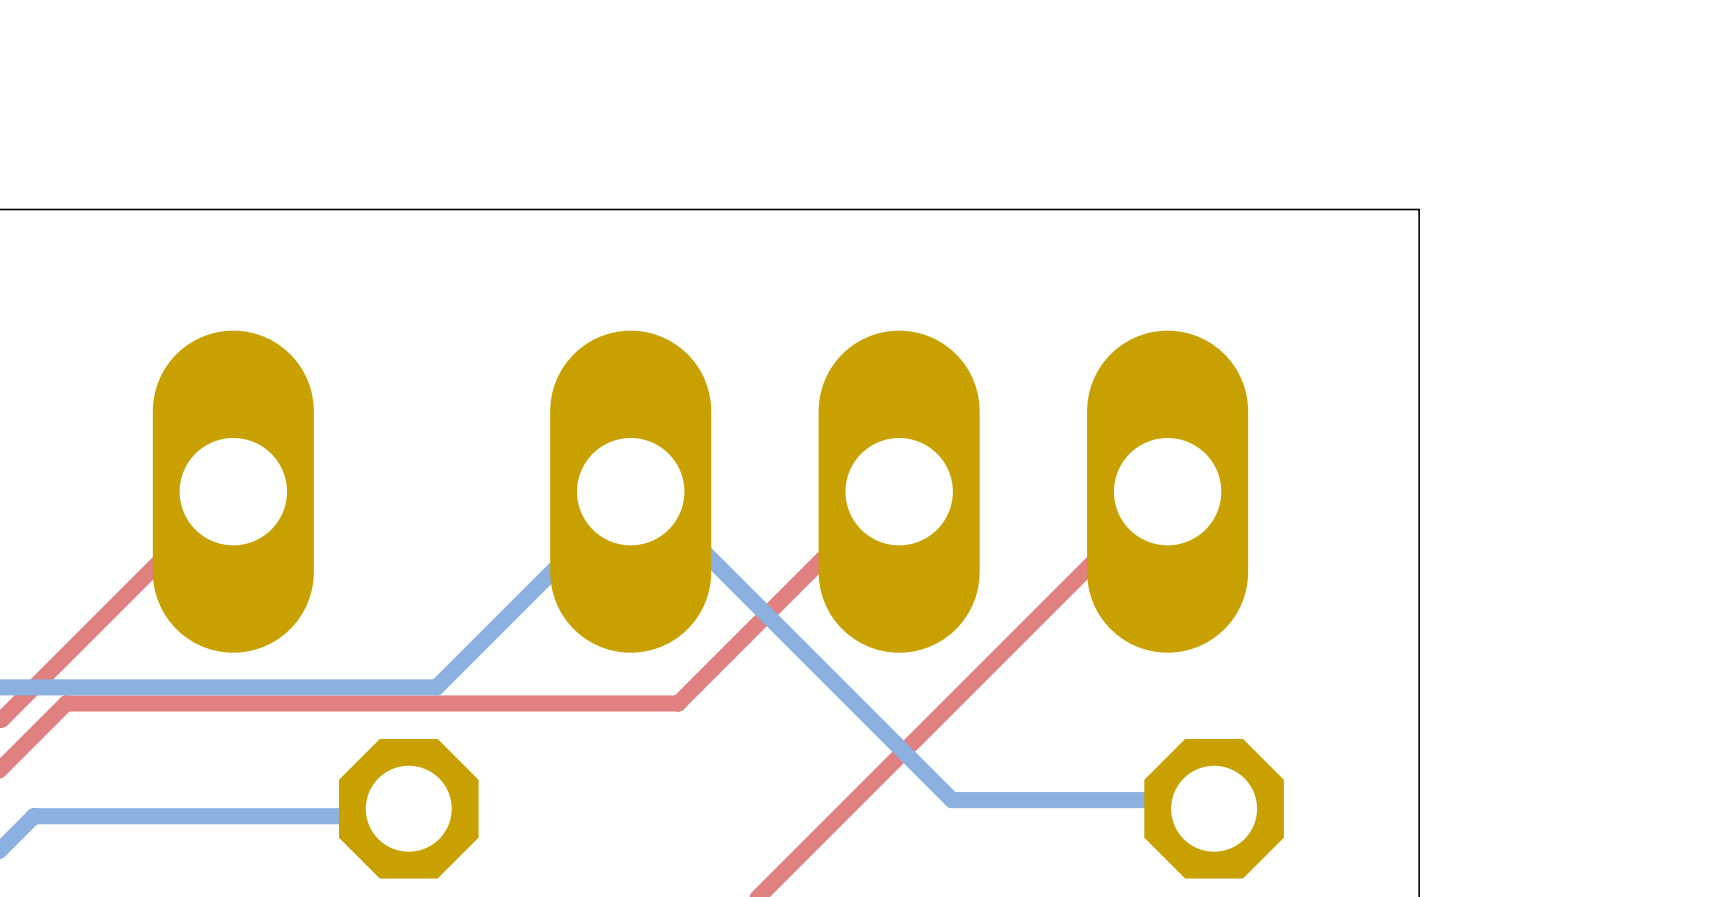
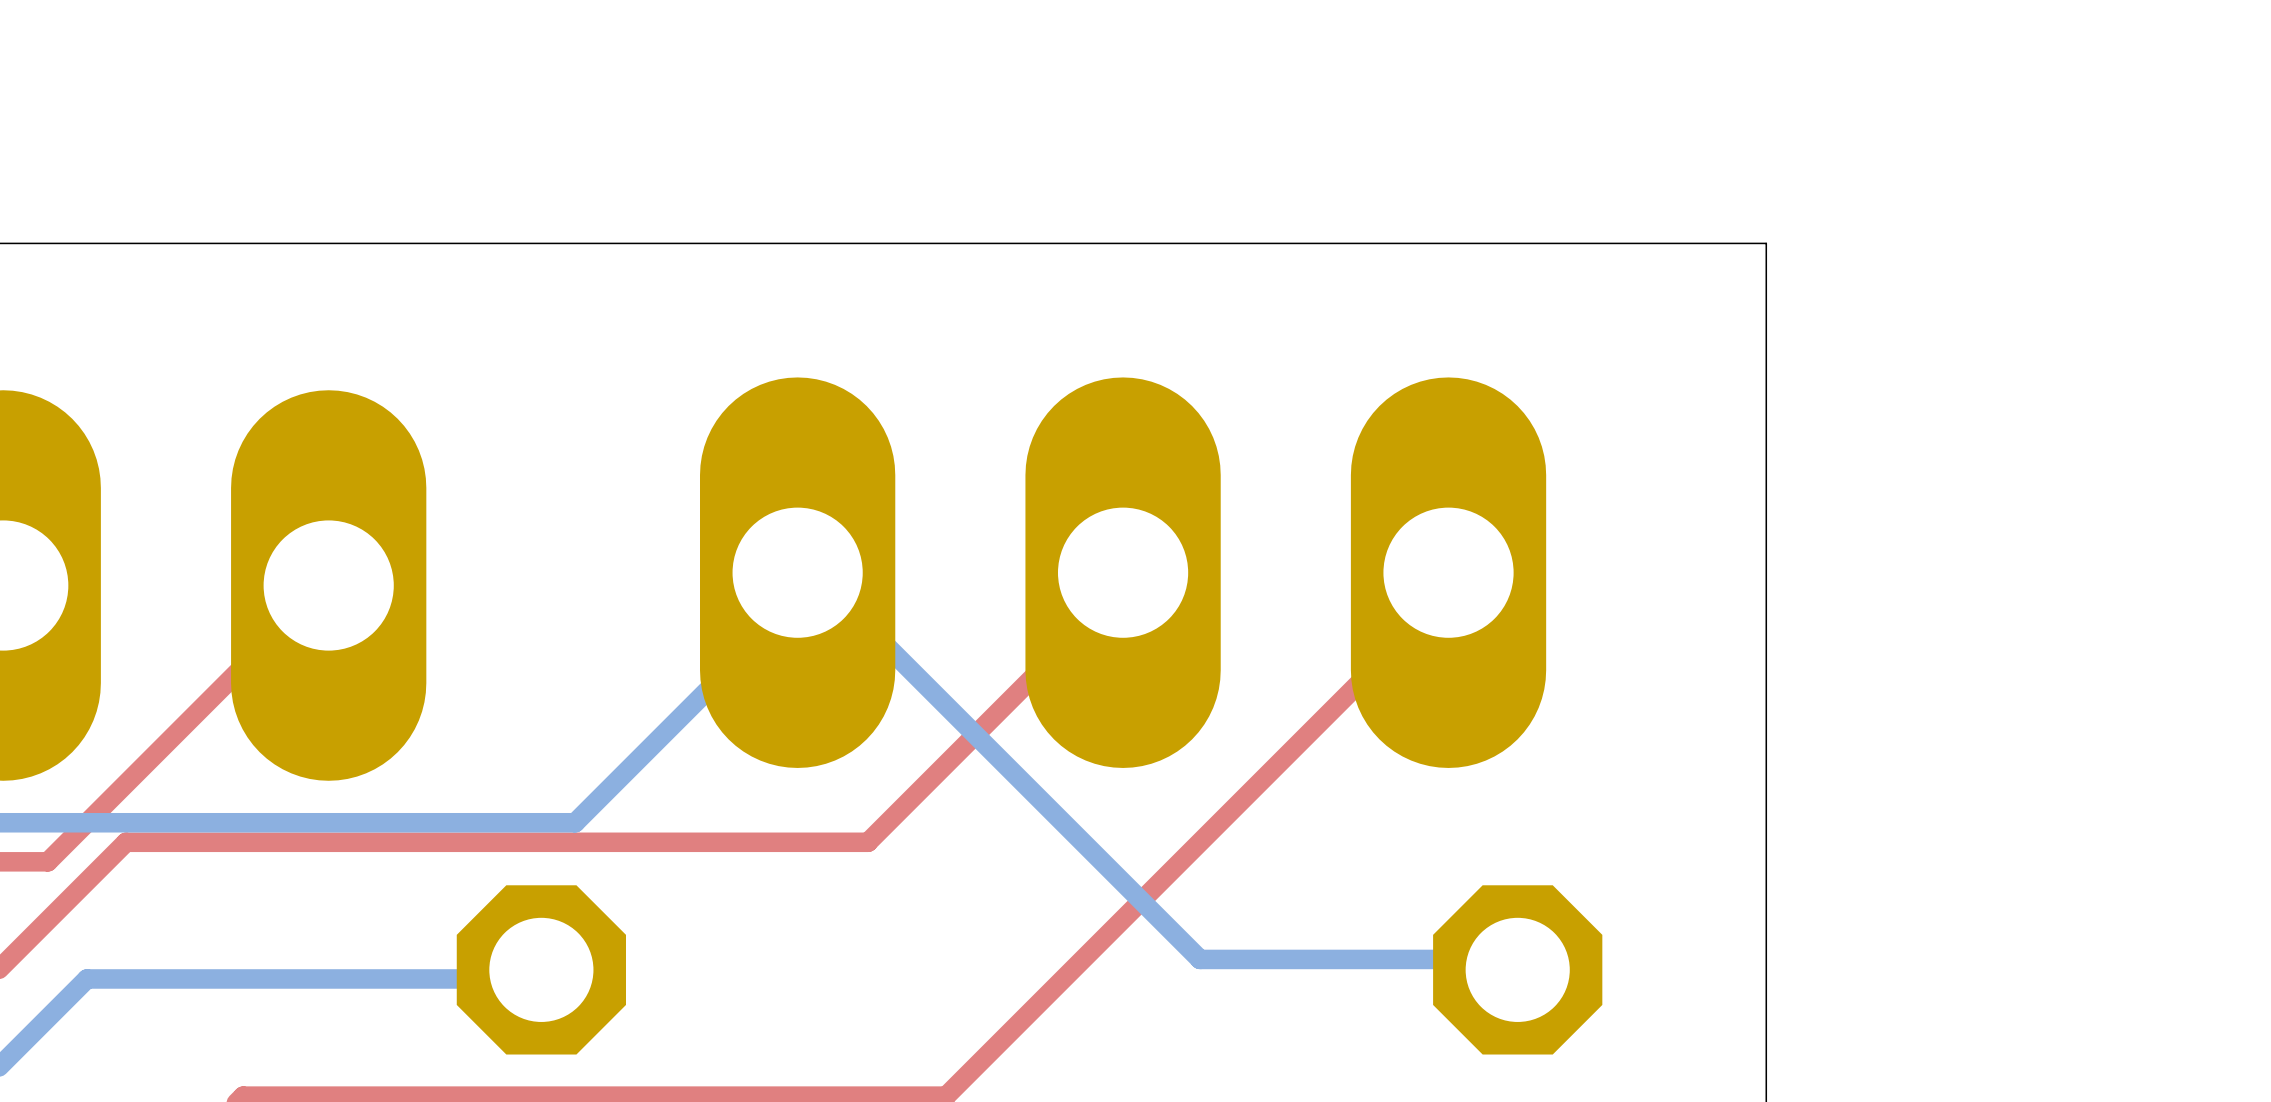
part position: (899, 491) -> (1123, 572)

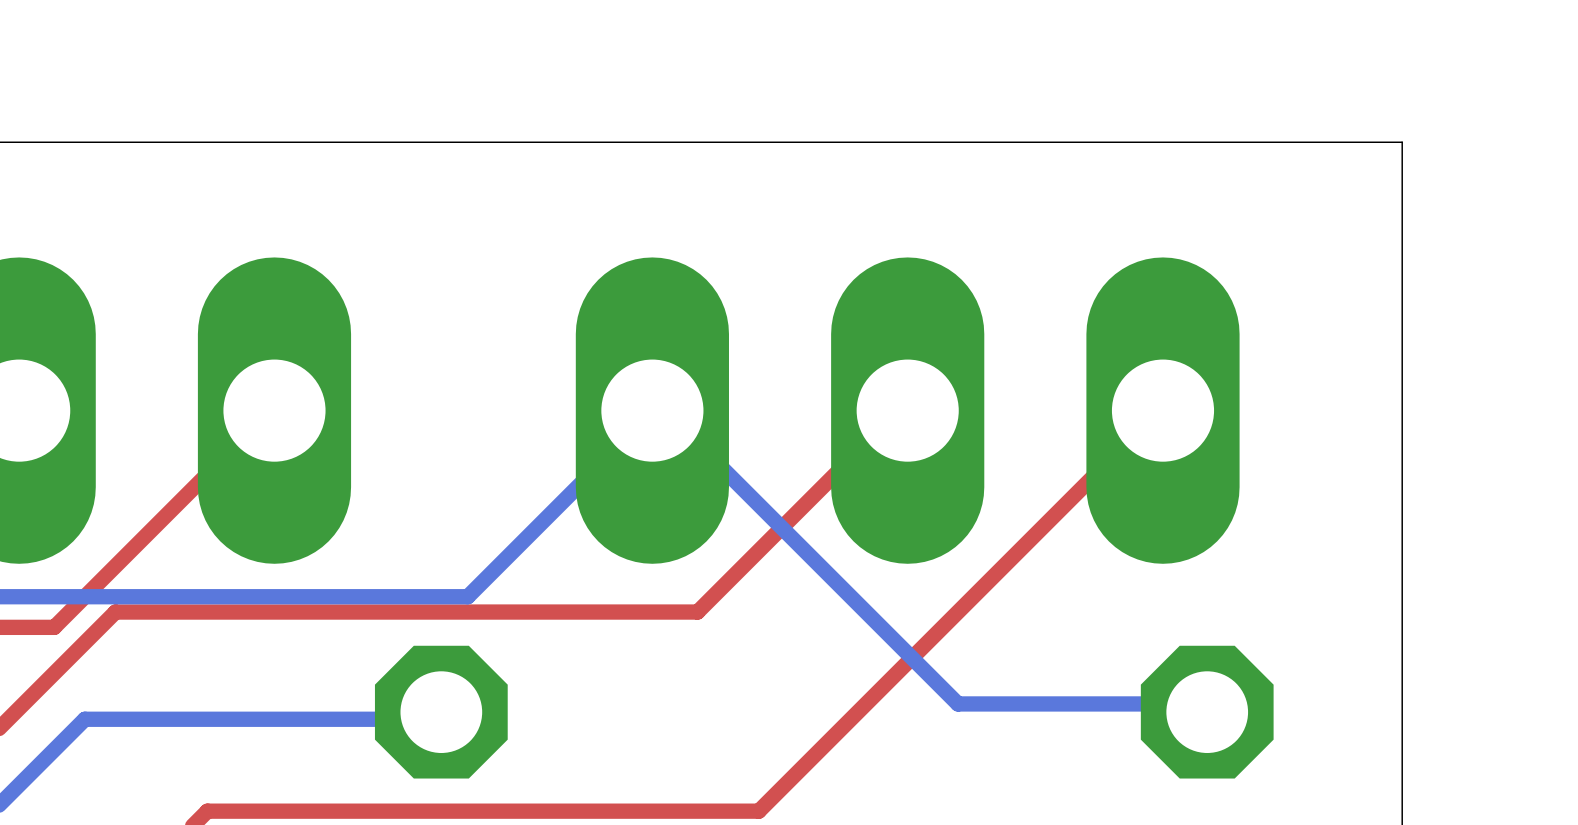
part position: (1123, 572) -> (907, 410)

